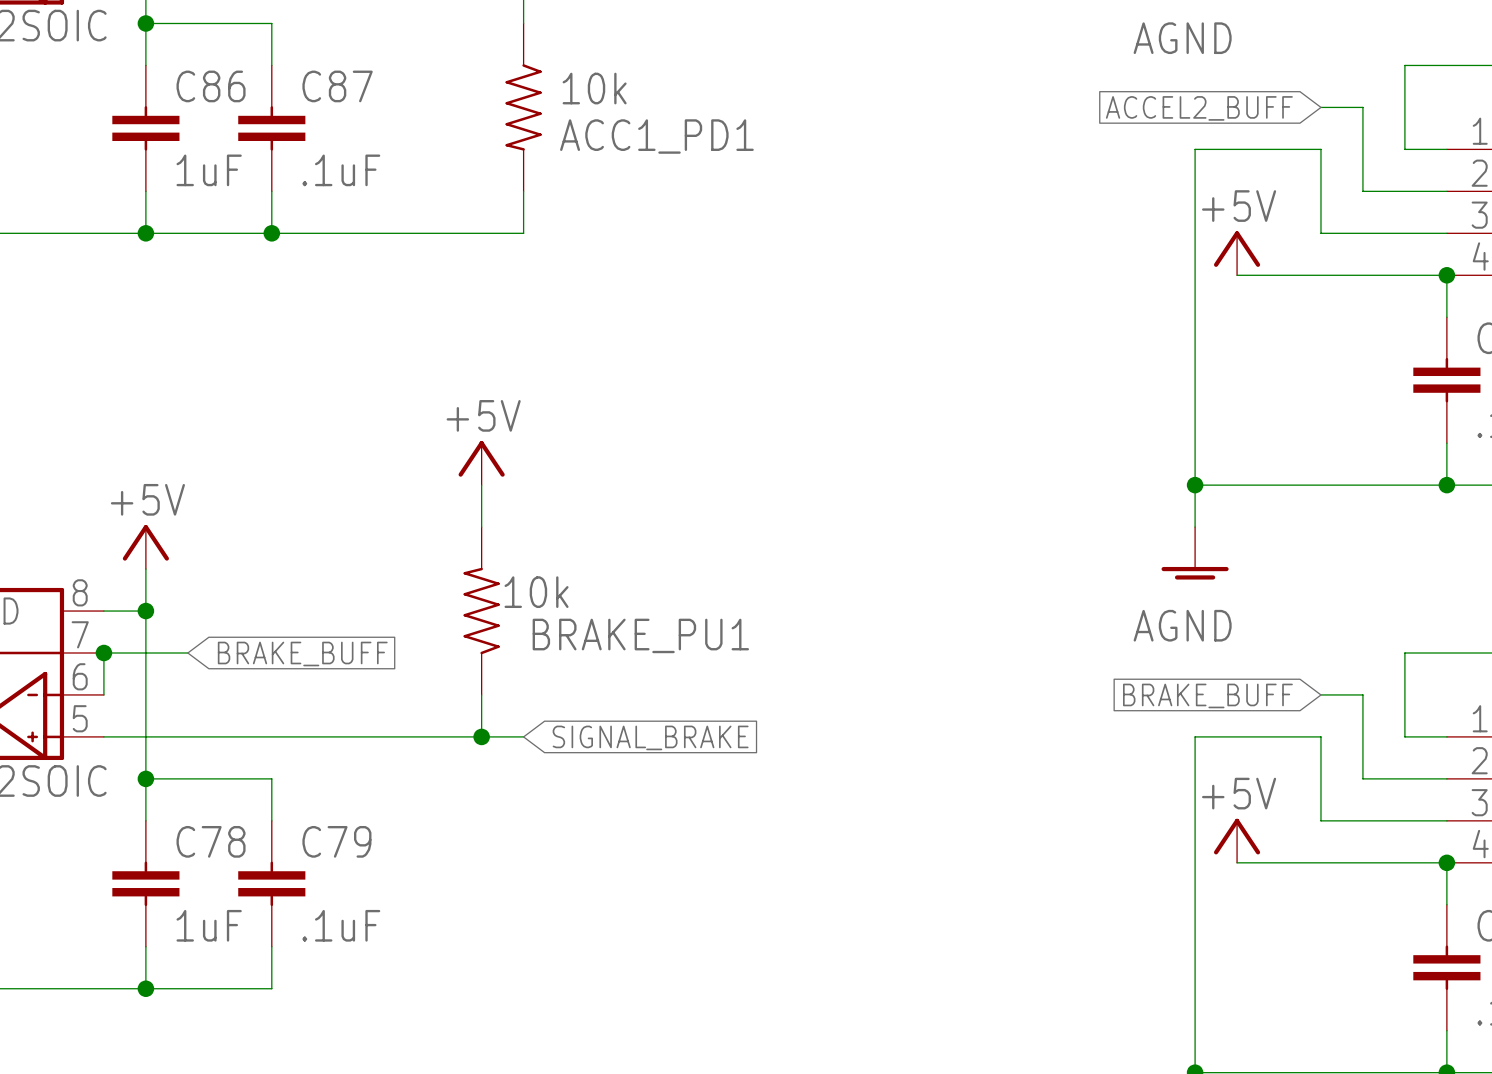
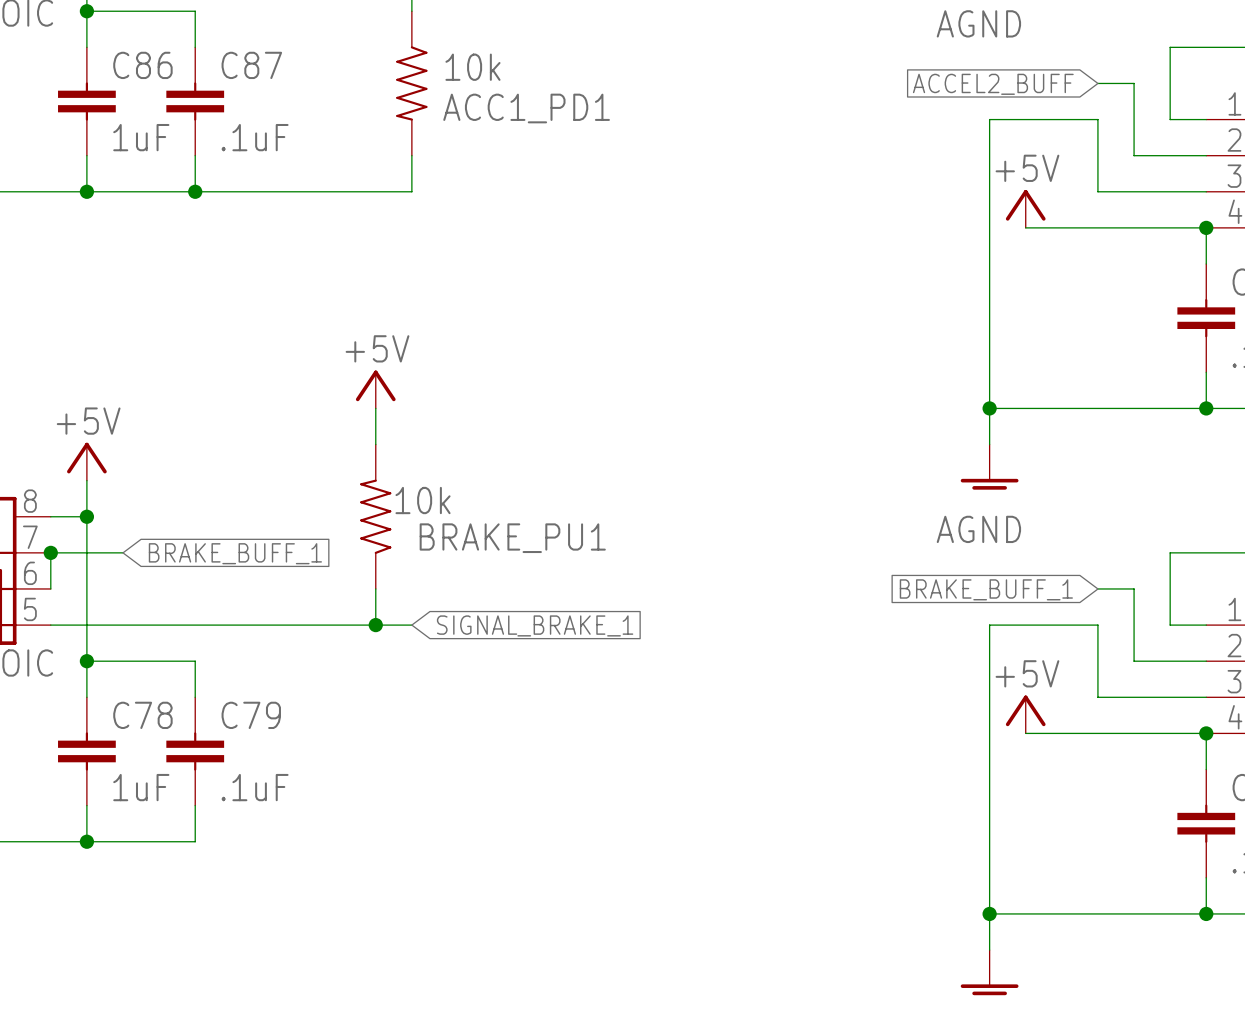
global label: BRAKE_BUFF (302, 653) -> BRAKE_BUFF_1 (235, 553)
global label: BRAKE_BUFF (1207, 695) -> BRAKE_BUFF_1 (986, 589)
global label: SIGNAL_BRAKE (650, 737) -> SIGNAL_BRAKE_1 (535, 625)

